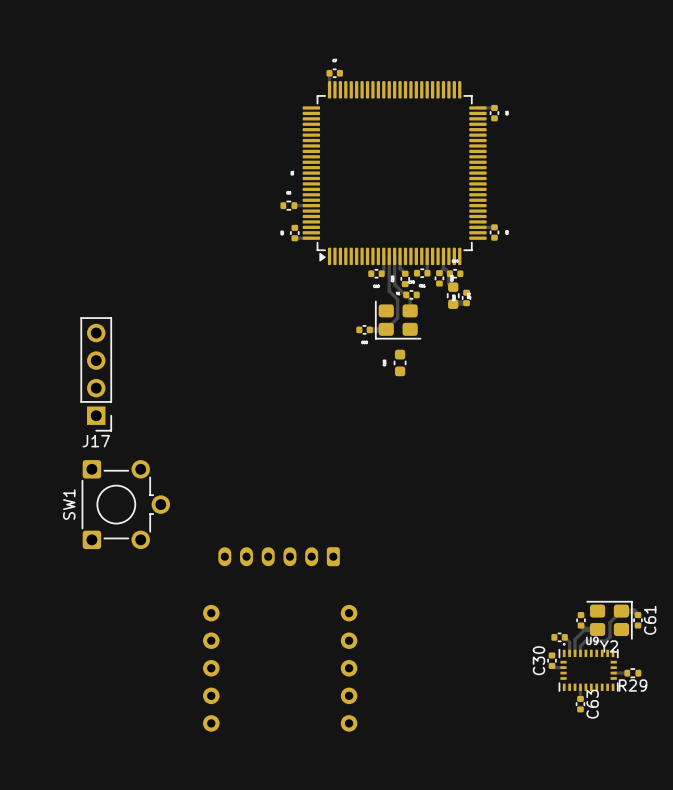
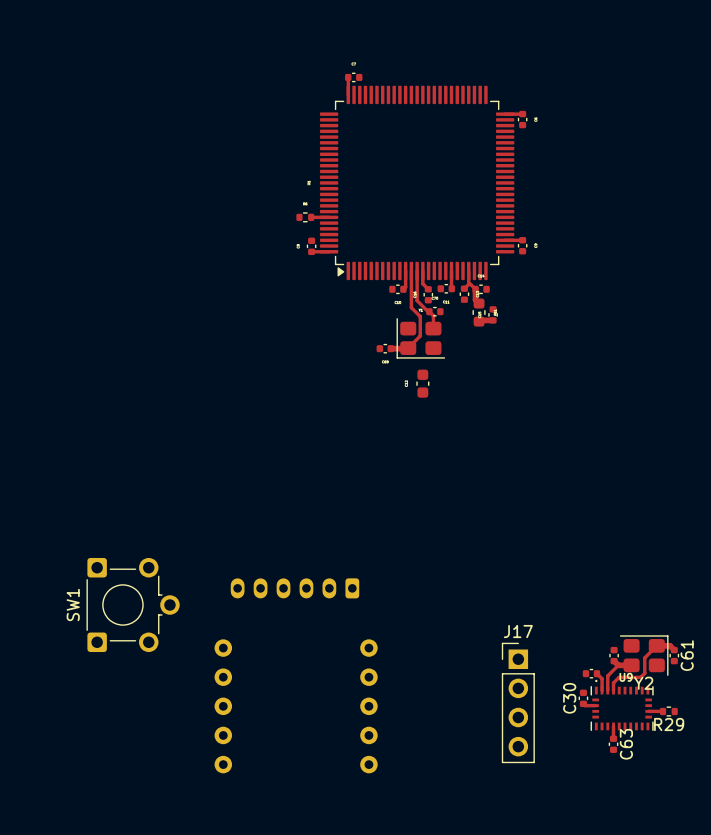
J17 rotation: 0° (96, 374) -> 180° (518, 702)
J17 position: (96, 374) -> (518, 702)
SW1 position: (125, 504) -> (133, 605)

